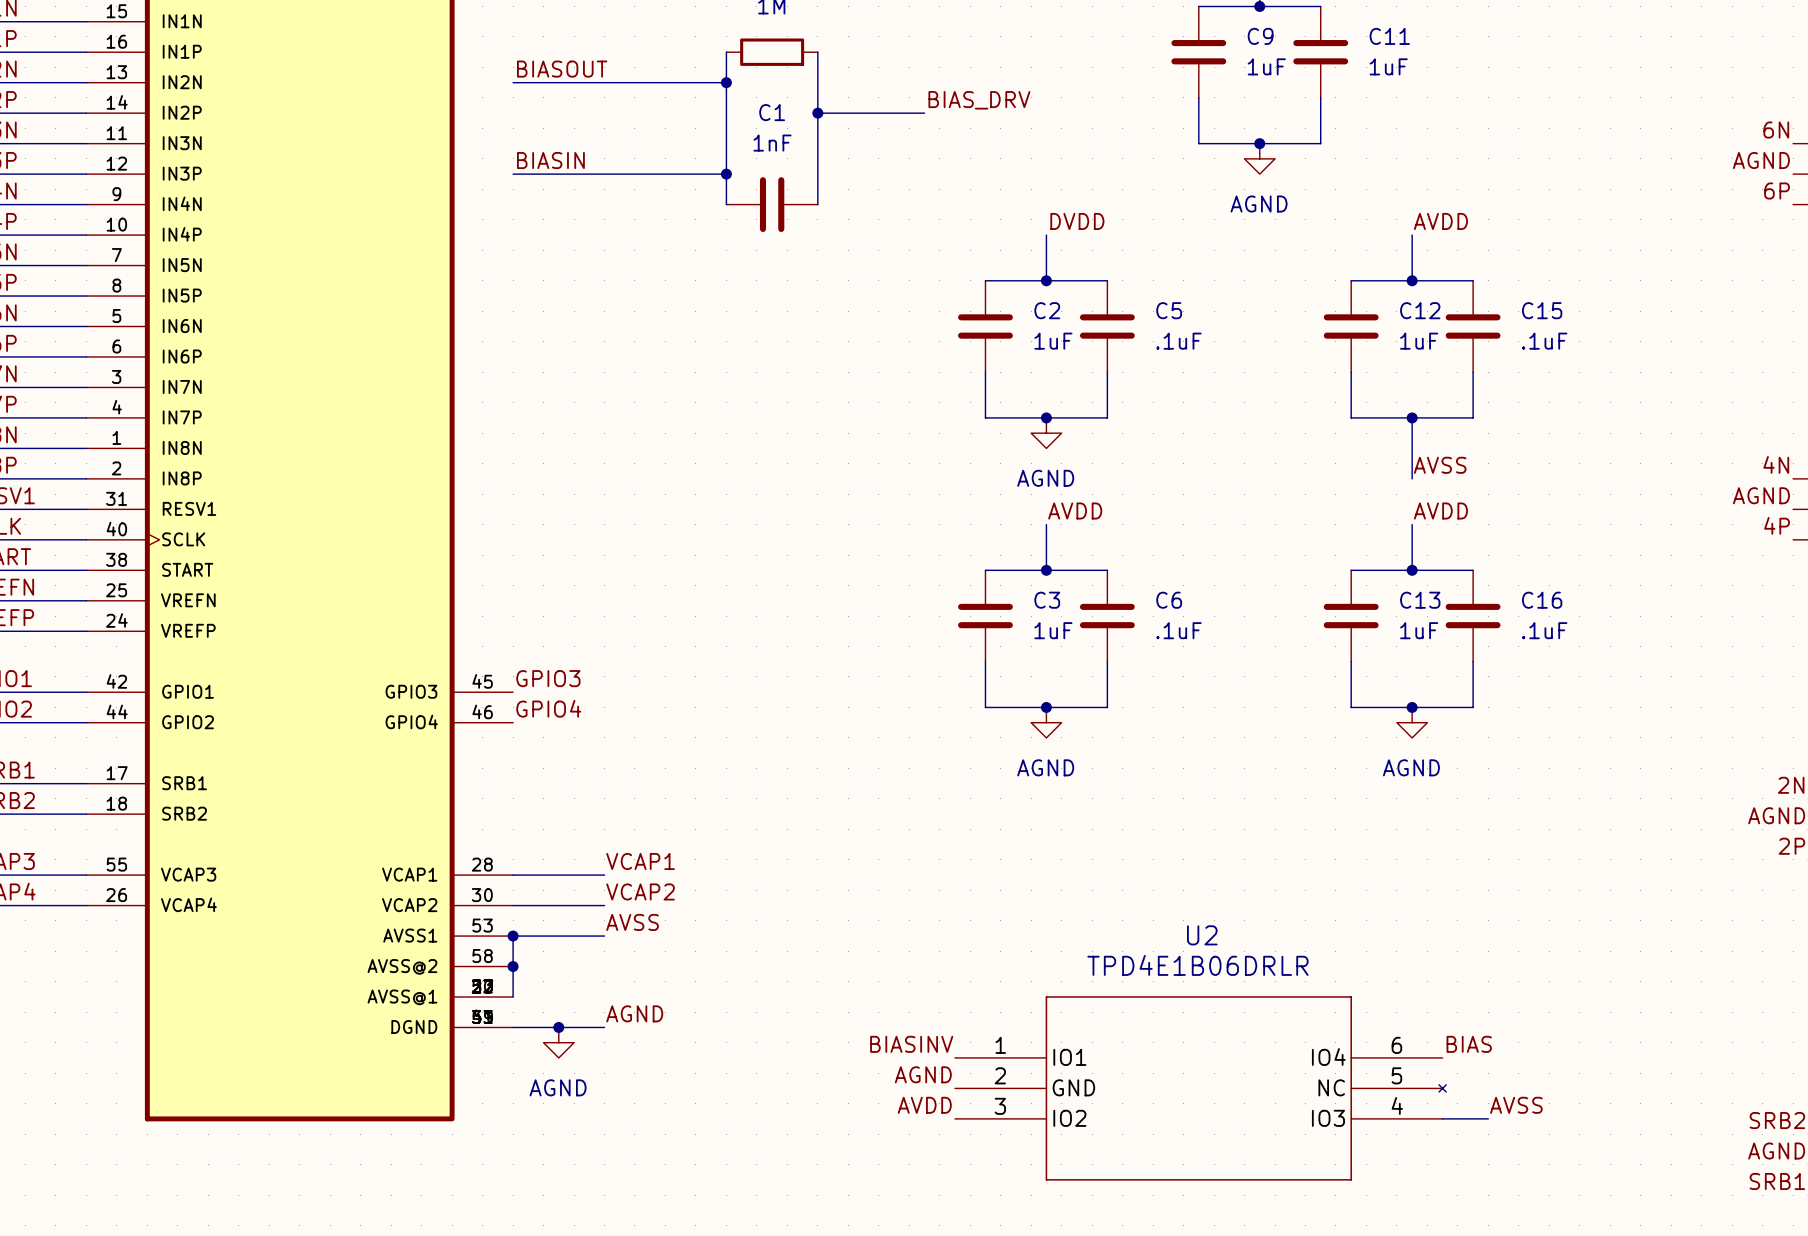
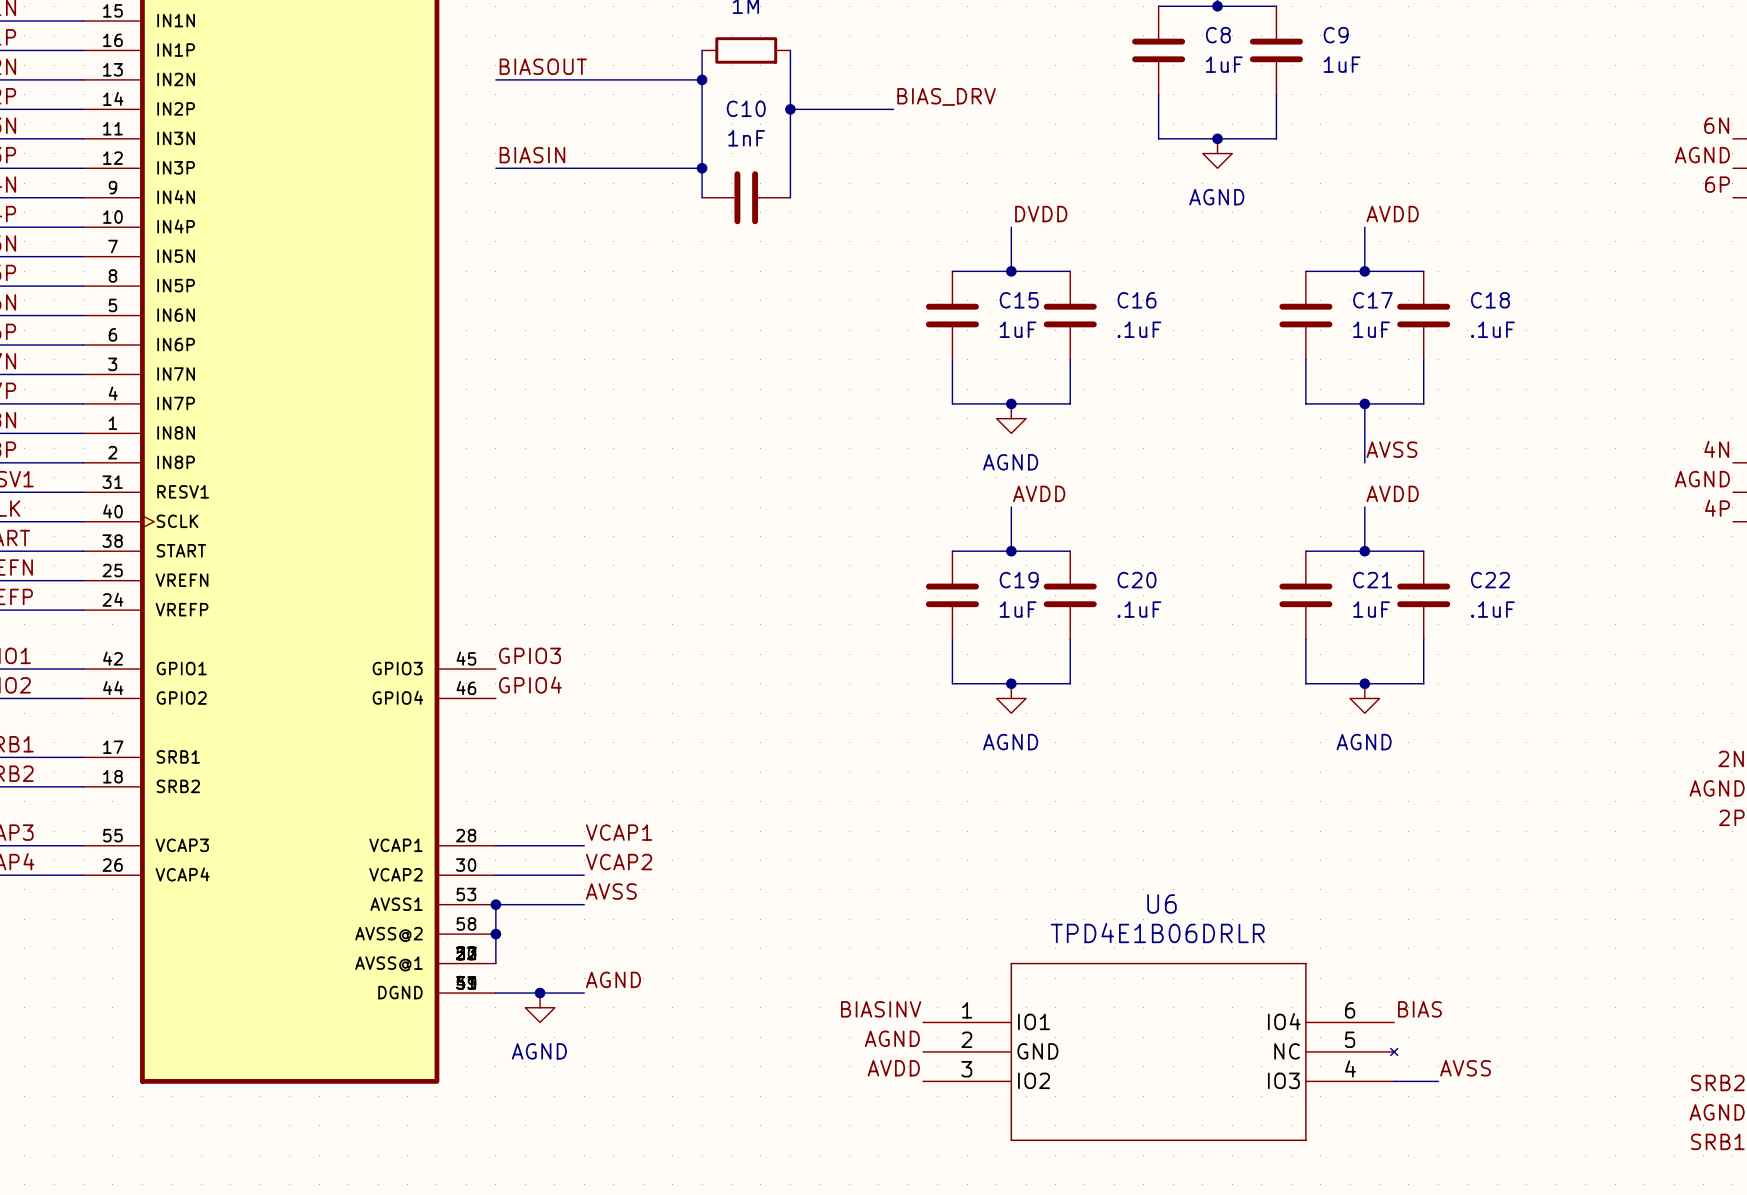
C9 name: C9 (1260, 36) -> C8 (1218, 35)
C11 name: C11 (1389, 36) -> C9 (1336, 35)
C1 name: C1 (772, 112) -> C10 (746, 108)
C2 name: C2 (1047, 310) -> C15 (1019, 300)
C5 name: C5 (1169, 310) -> C16 (1136, 300)
C12 name: C12 (1420, 310) -> C17 (1372, 300)
C15 name: C15 (1542, 310) -> C18 (1490, 300)
C3 name: C3 (1047, 600) -> C19 (1019, 580)
C6 name: C6 (1169, 600) -> C20 (1136, 580)
C13 name: C13 (1420, 600) -> C21 (1372, 580)
C16 name: C16 (1542, 600) -> C22 (1490, 580)
U2 name: U2 (1202, 935) -> U6 (1161, 904)

